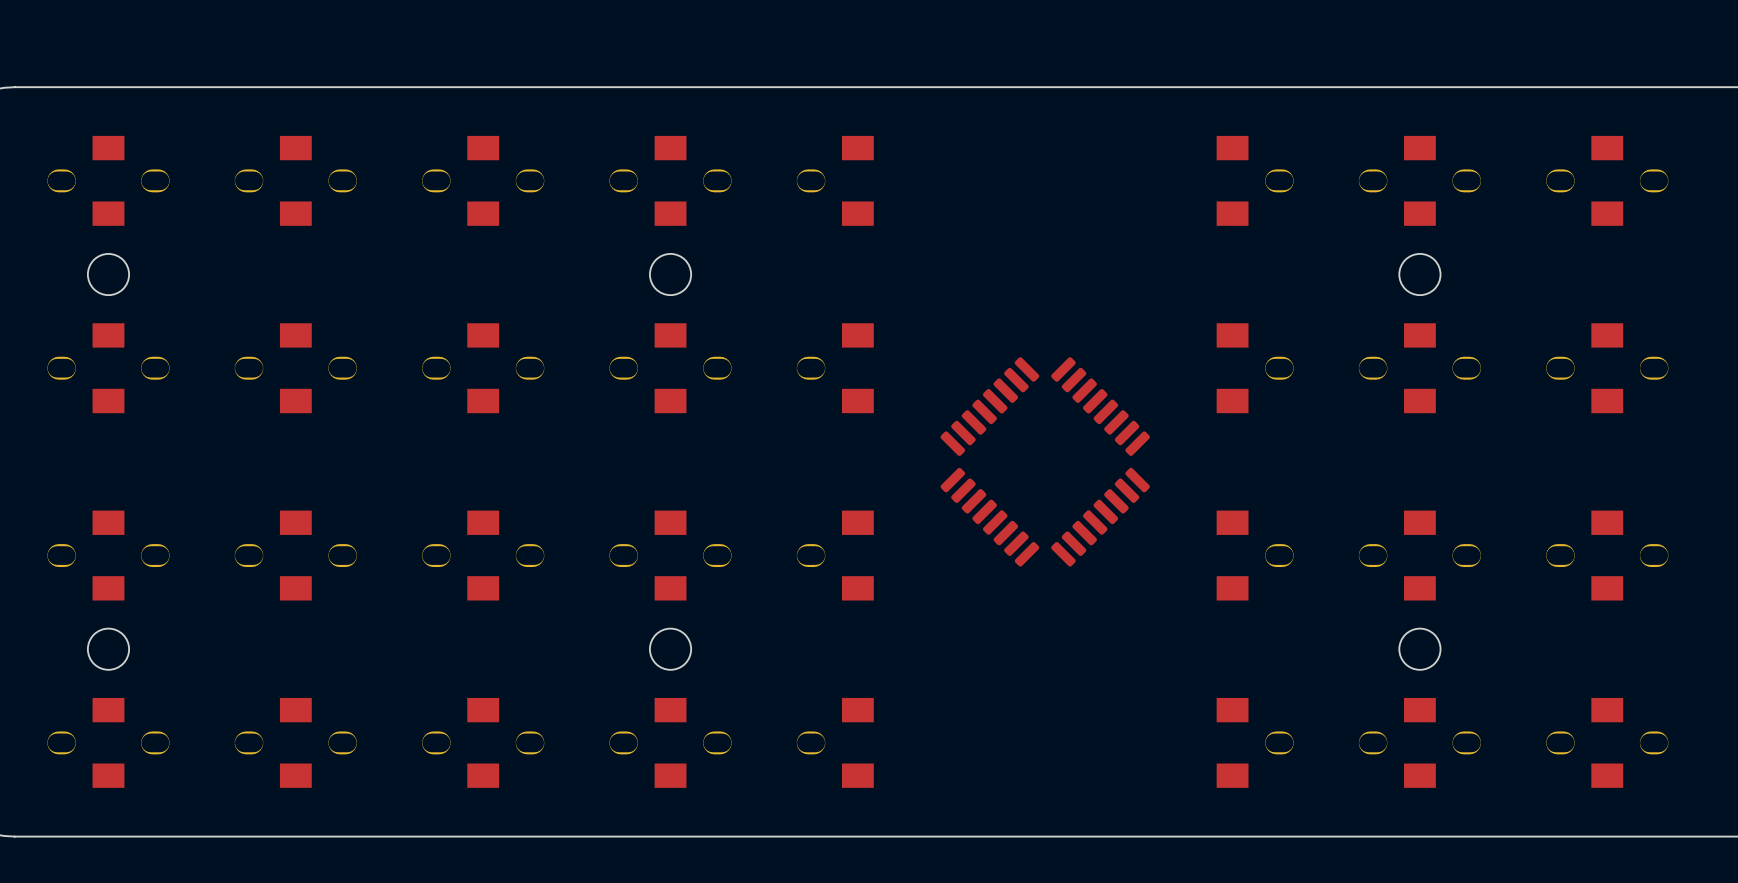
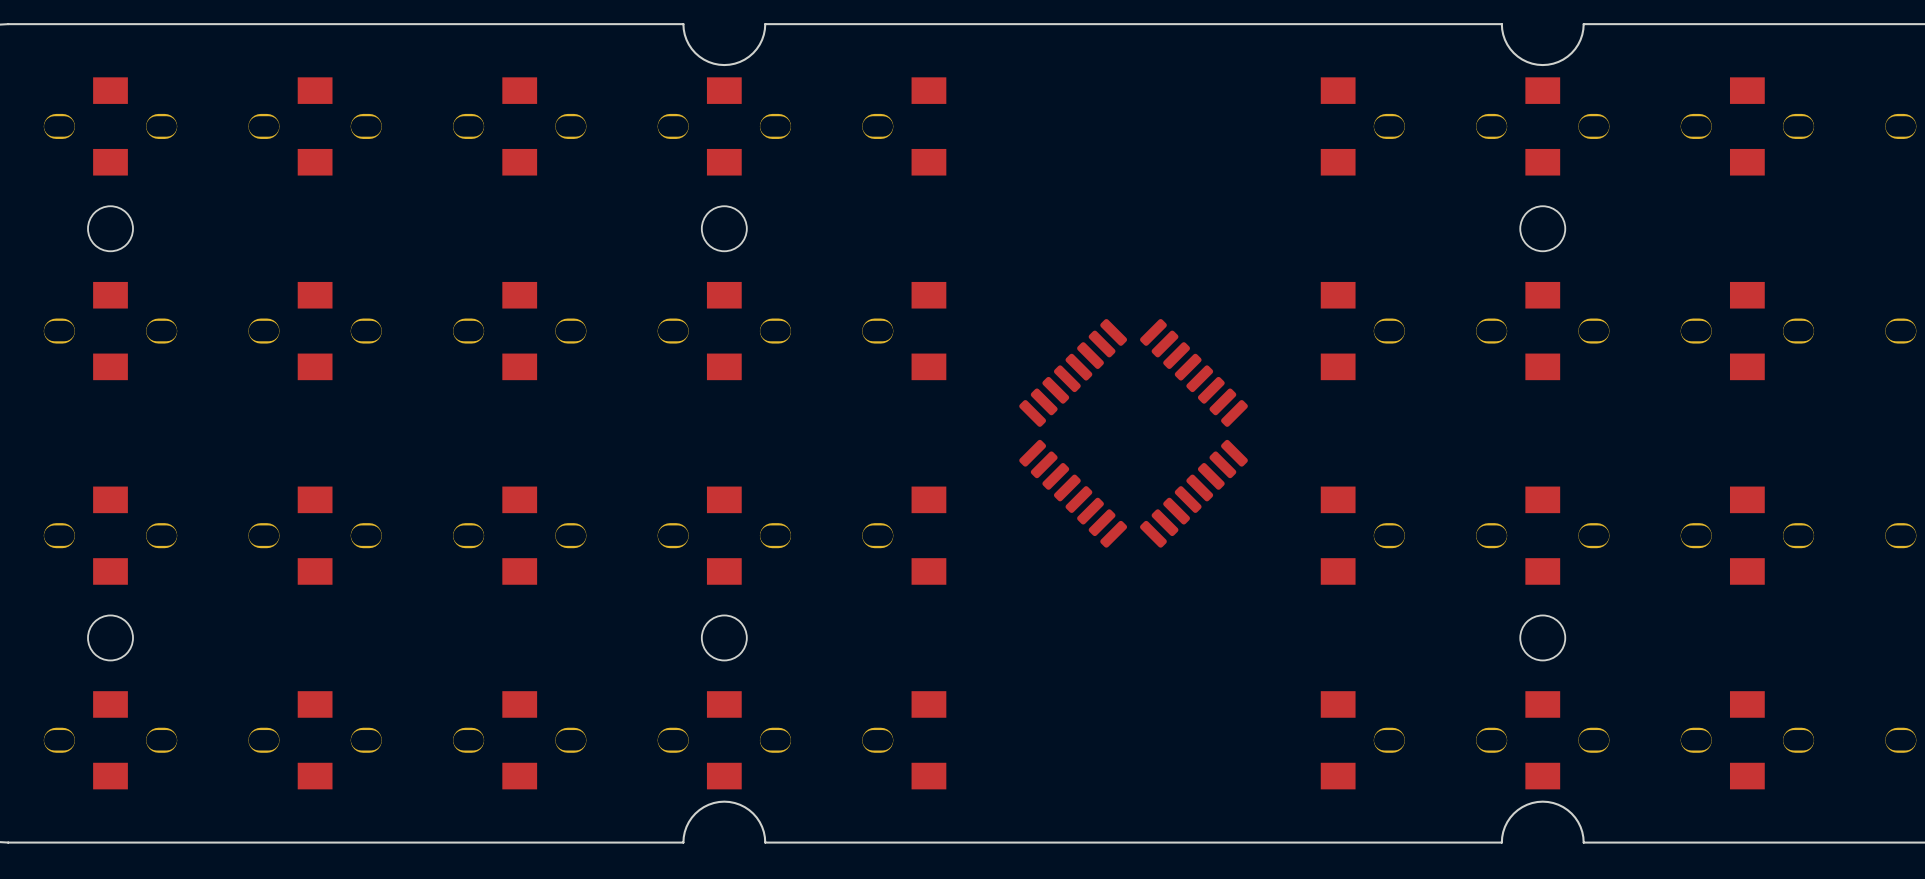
board edge: (708, 87) (633, 87) -> (765, 24) (762, 39) (753, 53) (739, 61) (724, 65) (708, 61) (695, 53) (686, 39) (683, 24)
board edge: (1457, 87) (1382, 87) -> (1583, 24) (1580, 39) (1571, 53) (1558, 61) (1542, 65) (1527, 61) (1513, 53) (1504, 39) (1501, 24)
board edge: (708, 836) (633, 836) -> (765, 842) (762, 826) (753, 813) (739, 804) (724, 801) (708, 804) (695, 813) (686, 826) (683, 842)
board edge: (1457, 836) (1382, 836) -> (1583, 842) (1580, 826) (1571, 813) (1558, 804) (1542, 801) (1527, 804) (1513, 813) (1504, 826) (1501, 842)

